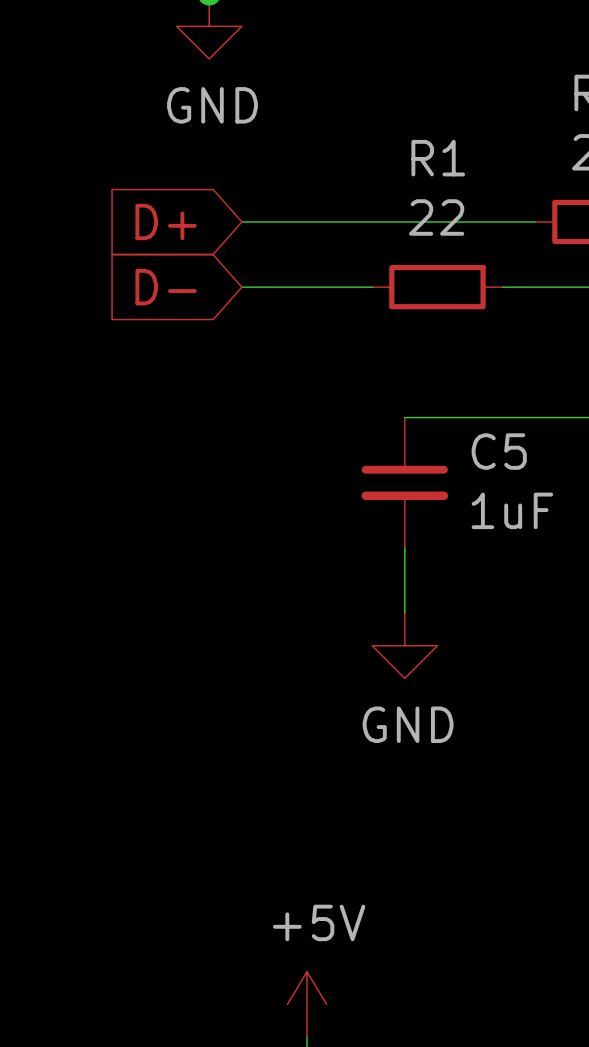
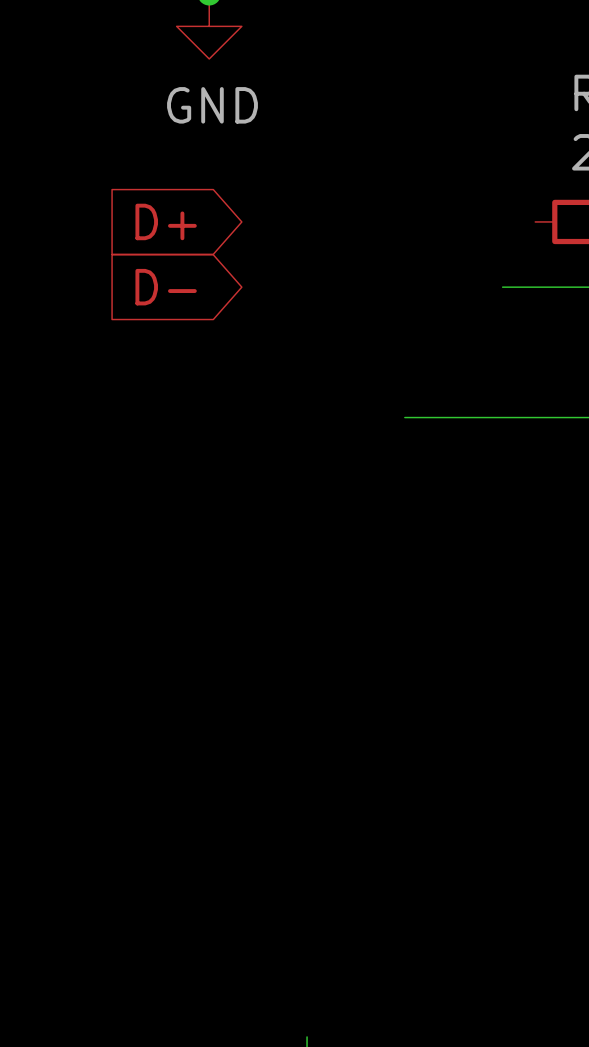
wire: (241, 221) (535, 221) -> none
wire: (241, 287) (372, 287) -> none
R1: 22 (437, 287) -> none
C5: 1uF (404, 482) -> none
wire: (404, 547) (404, 613) -> none
power symbol: GND (404, 645) -> none
power symbol: +5V (307, 1004) -> none

